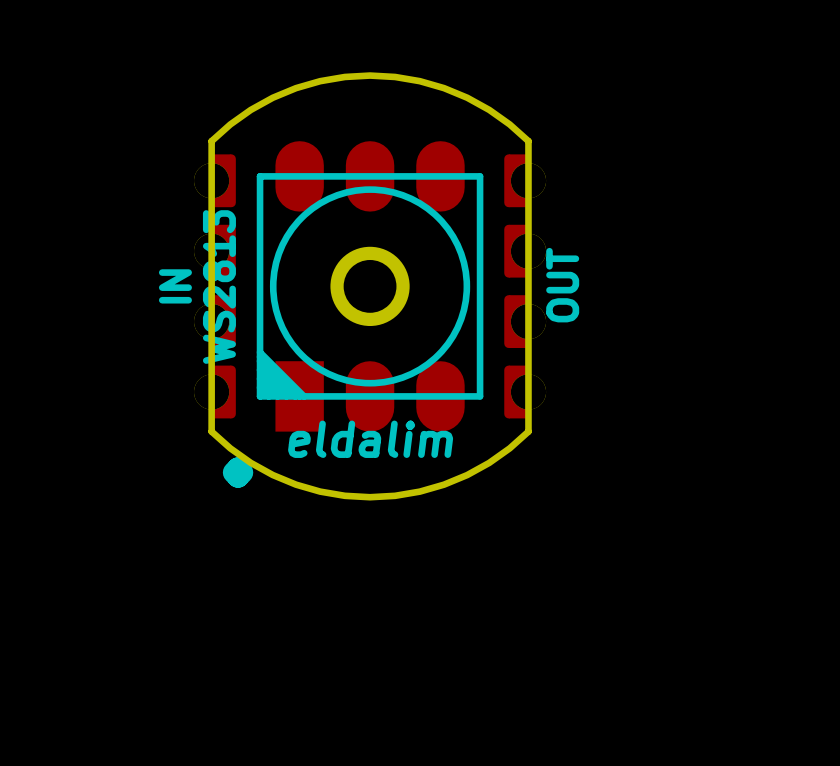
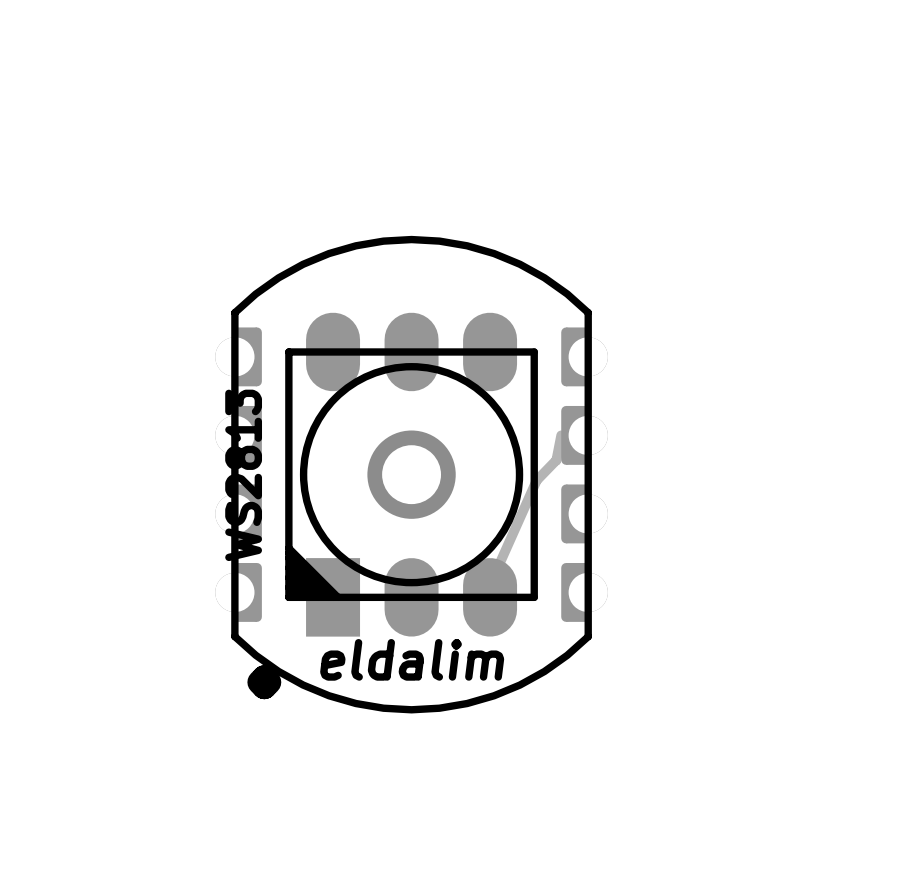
track: none -> (561, 435) (556, 460)
track: none -> (555, 460) (536, 480) (490, 585) (490, 597)
part value: OUT (562, 285) -> none
part value: IN (175, 286) -> none
text position: eldalim (370, 439) -> eldalim (412, 659)

